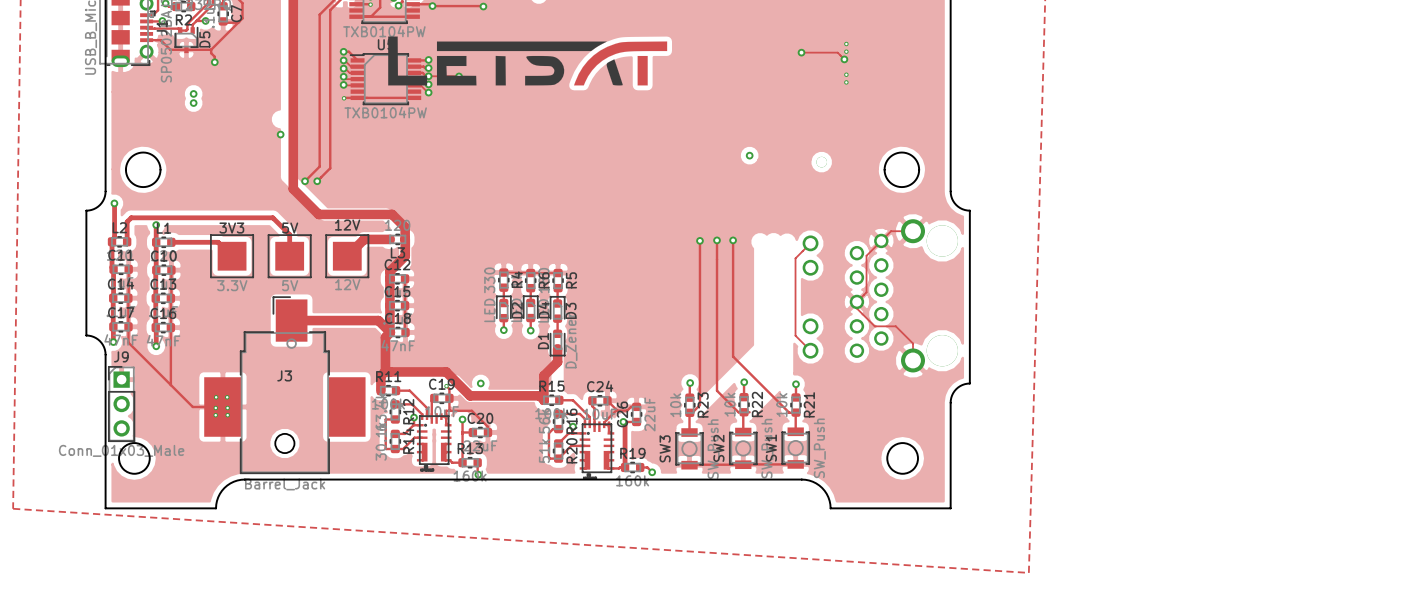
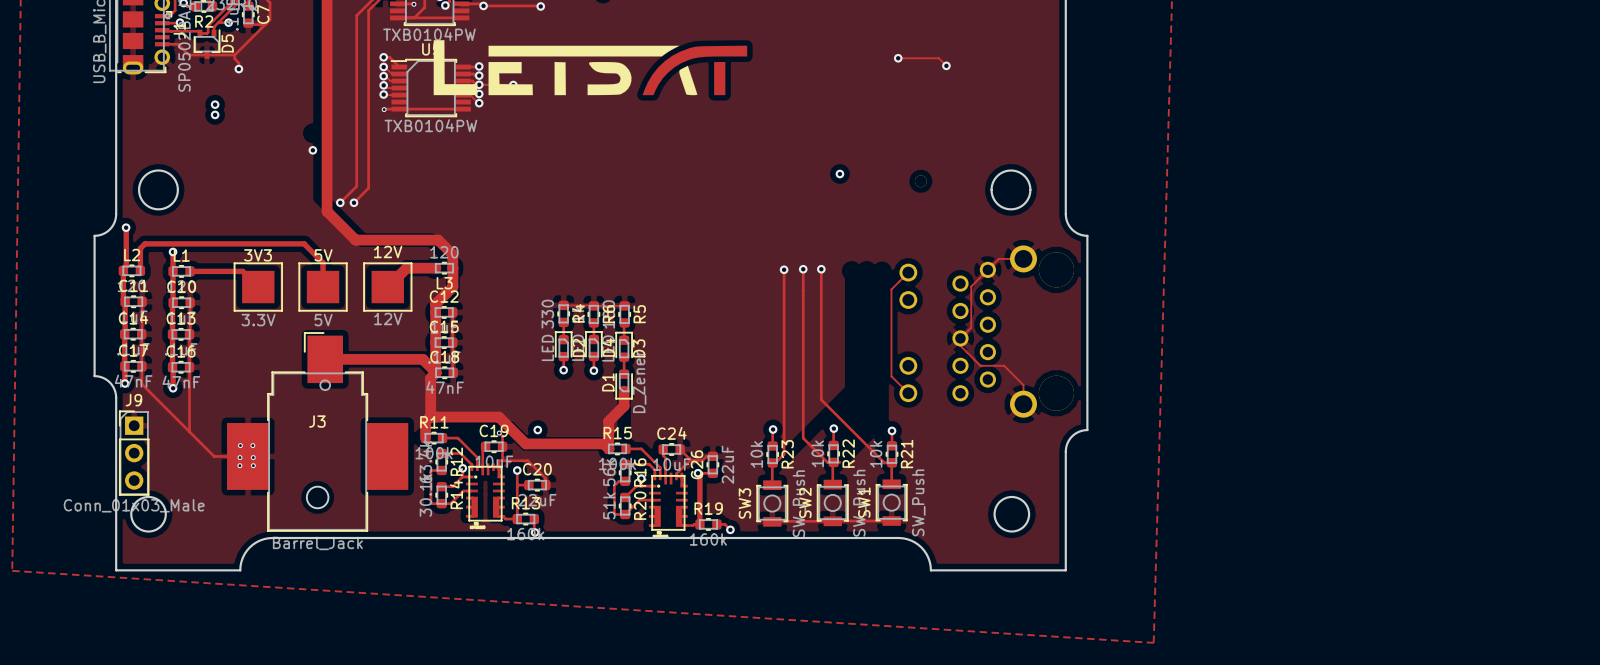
via: (846, 44) -> none
via: (846, 51) -> none
via: (846, 74) -> none
via: (846, 82) -> none

